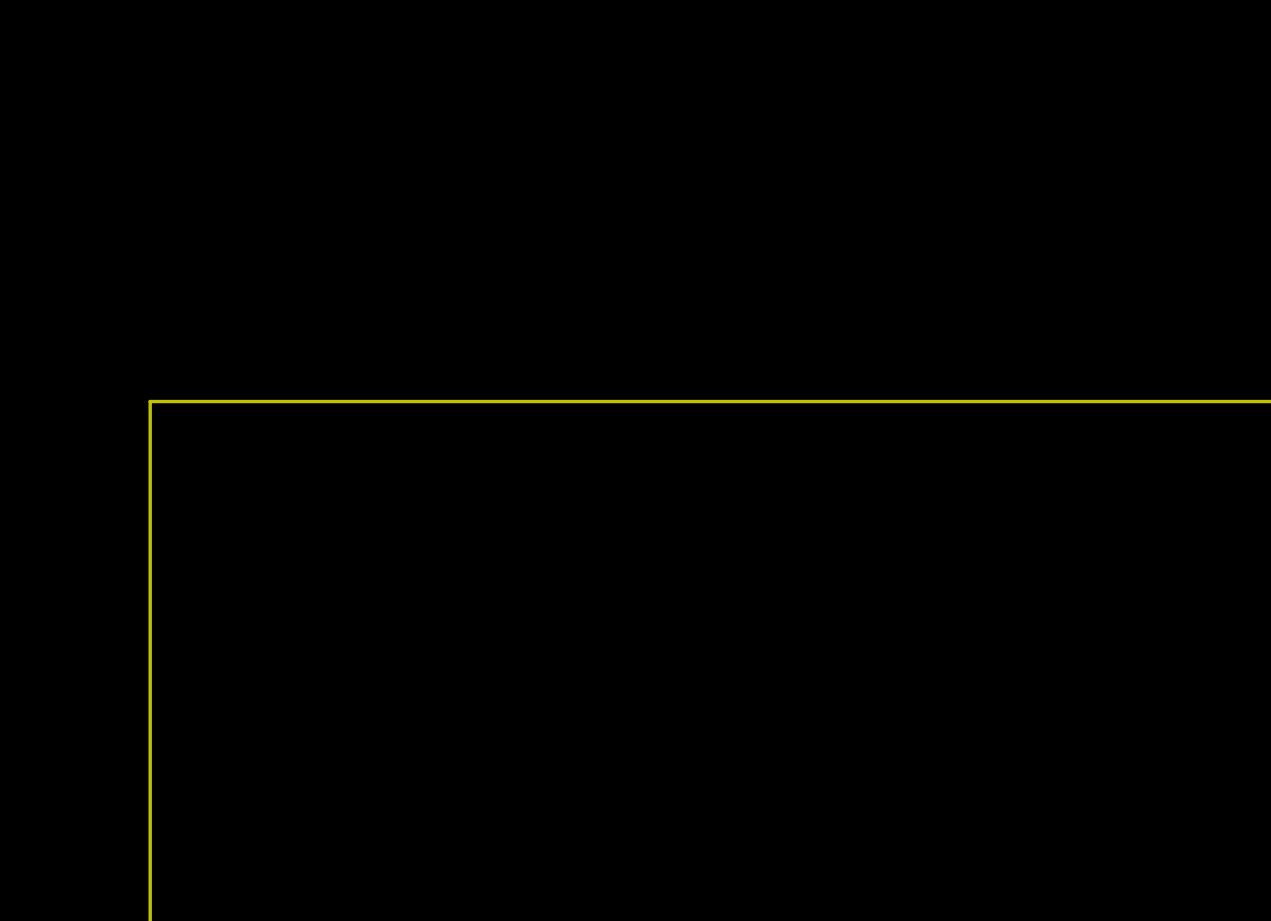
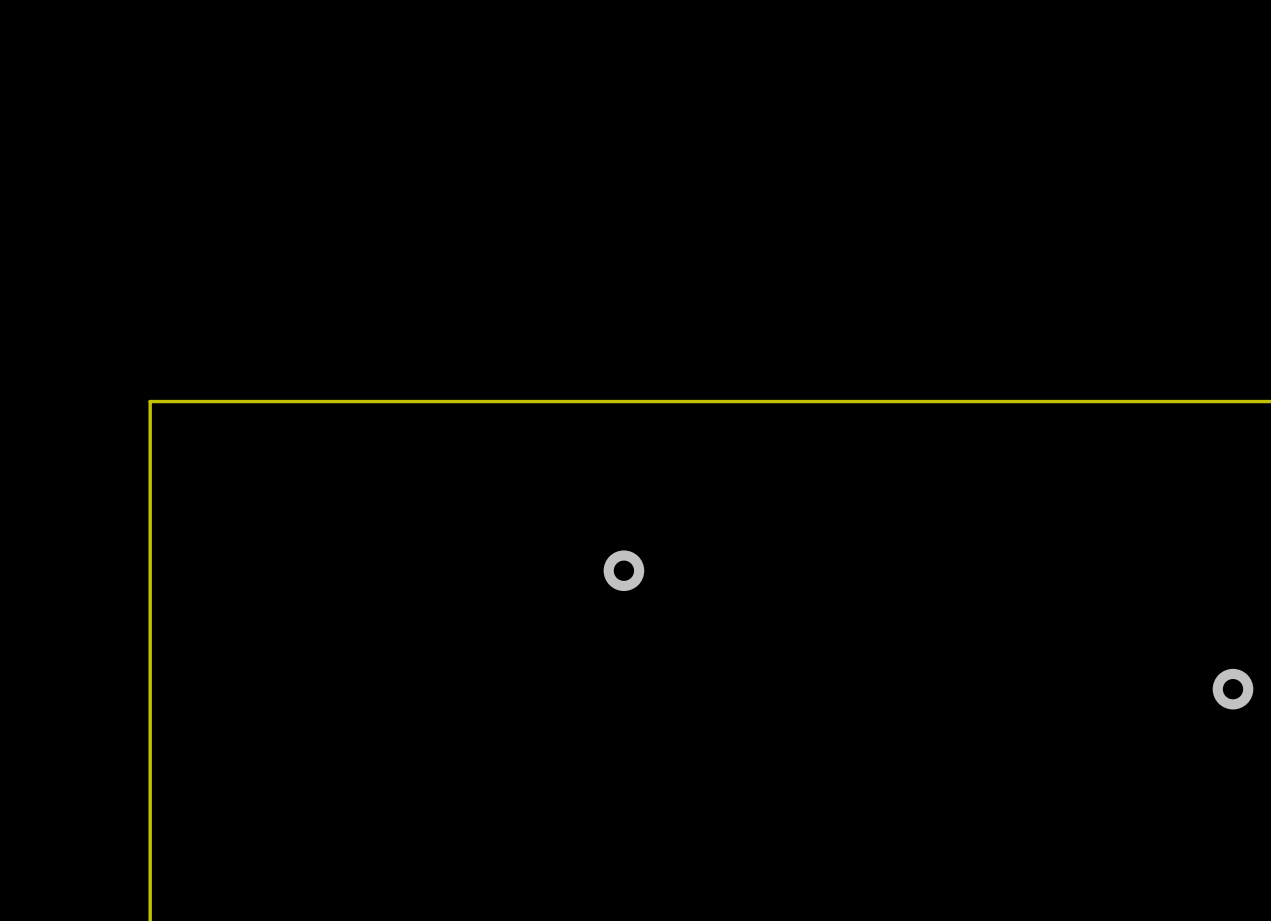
via: none -> (623, 570)
via: none -> (1233, 689)

